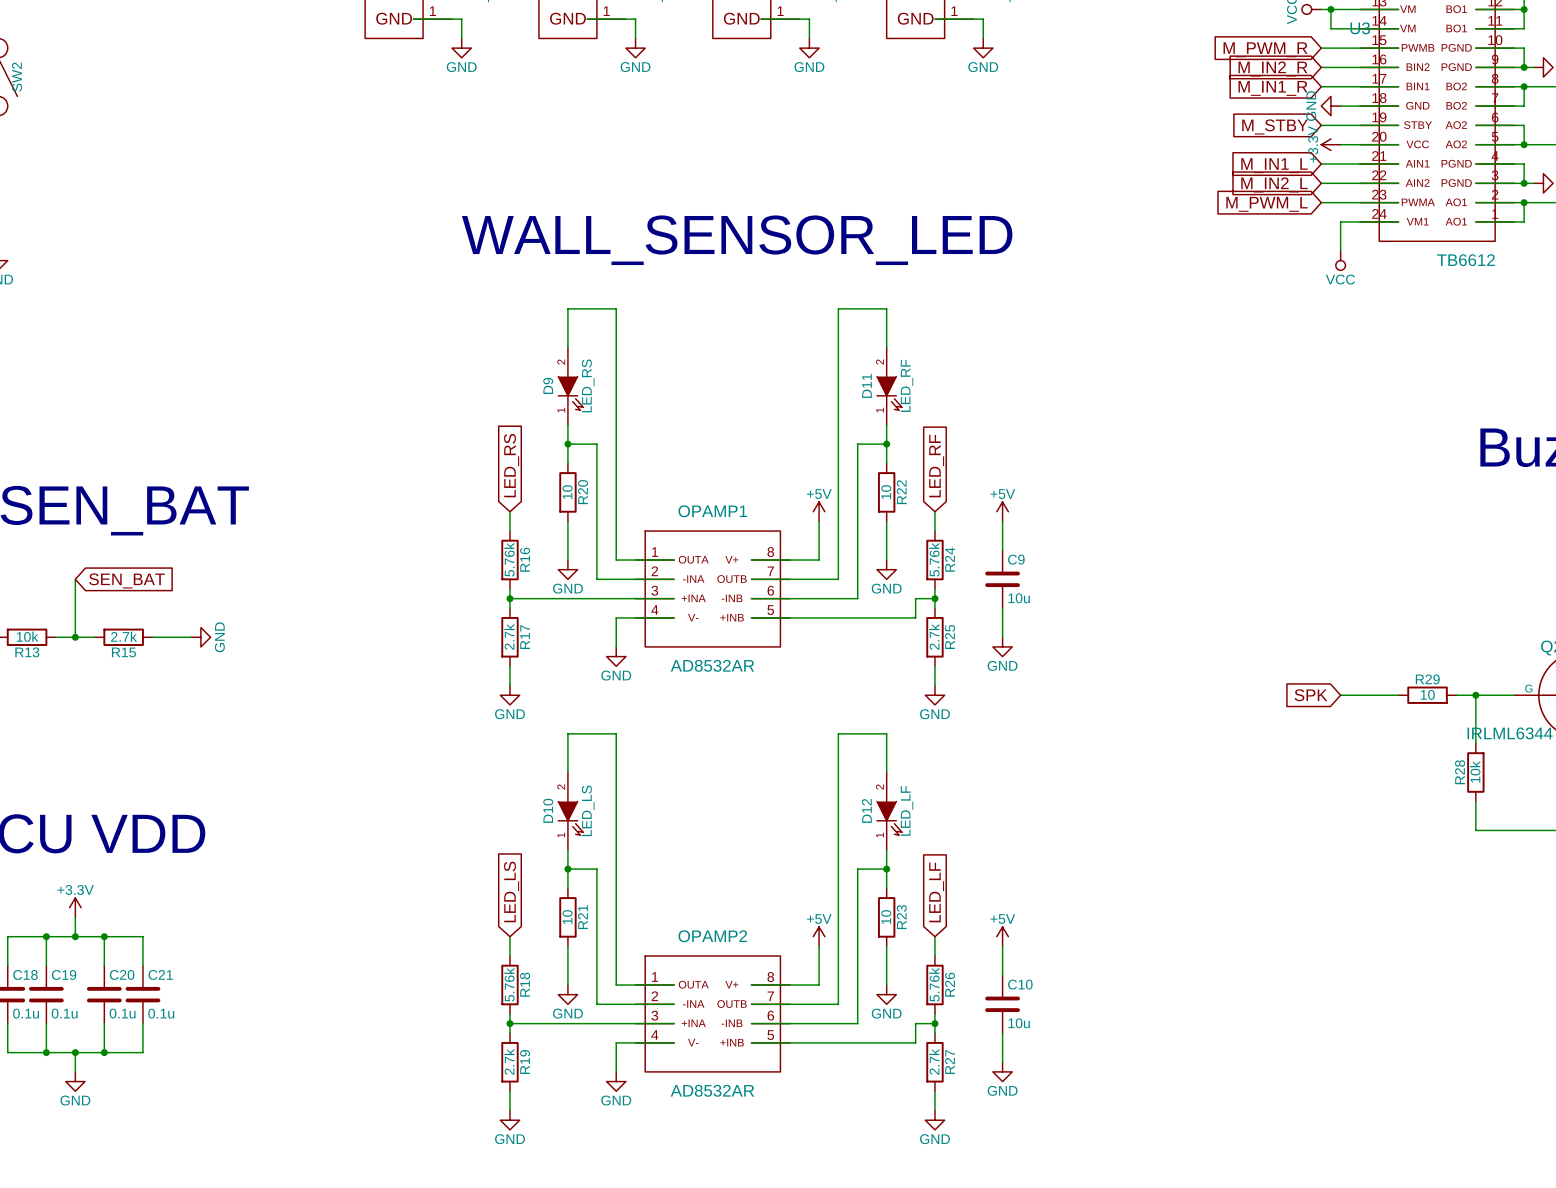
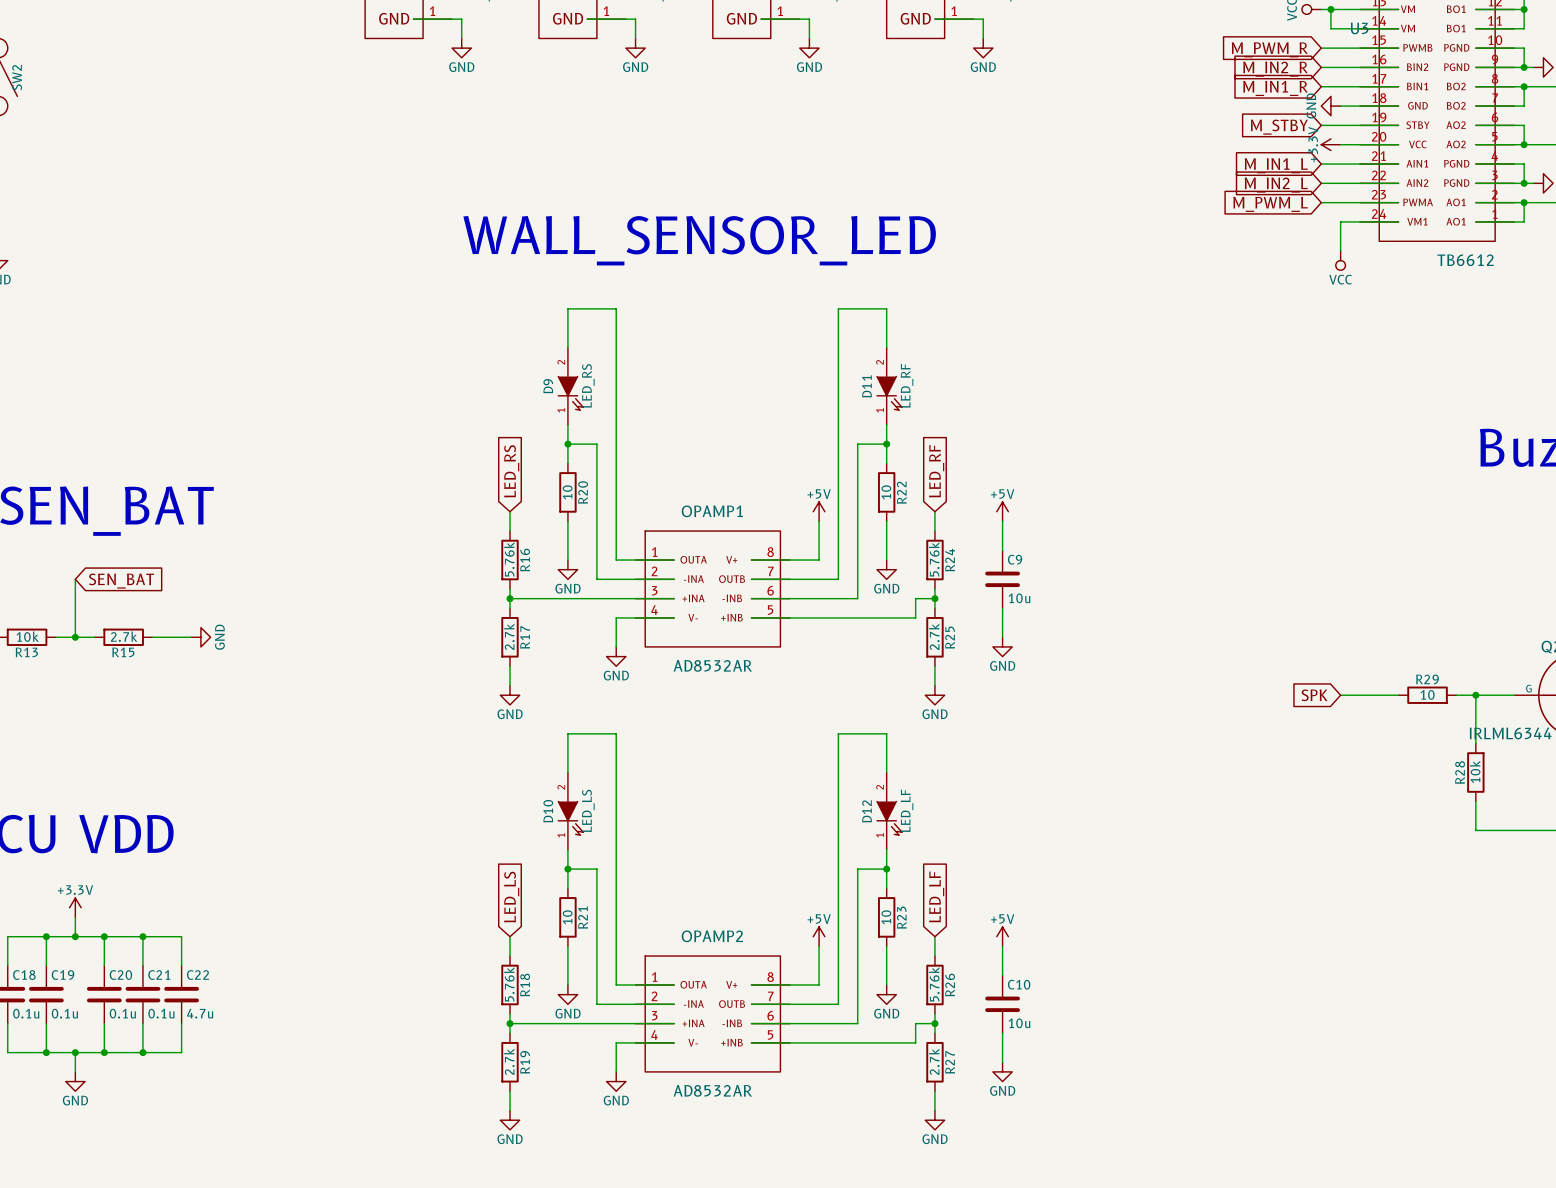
wire: none -> (142, 936) (181, 936) (181, 965)
junction: none -> (142, 936)
C22: none -> 4.7u (181, 994)
wire: none -> (181, 1023) (181, 1052) (142, 1052)
junction: none -> (142, 1052)

